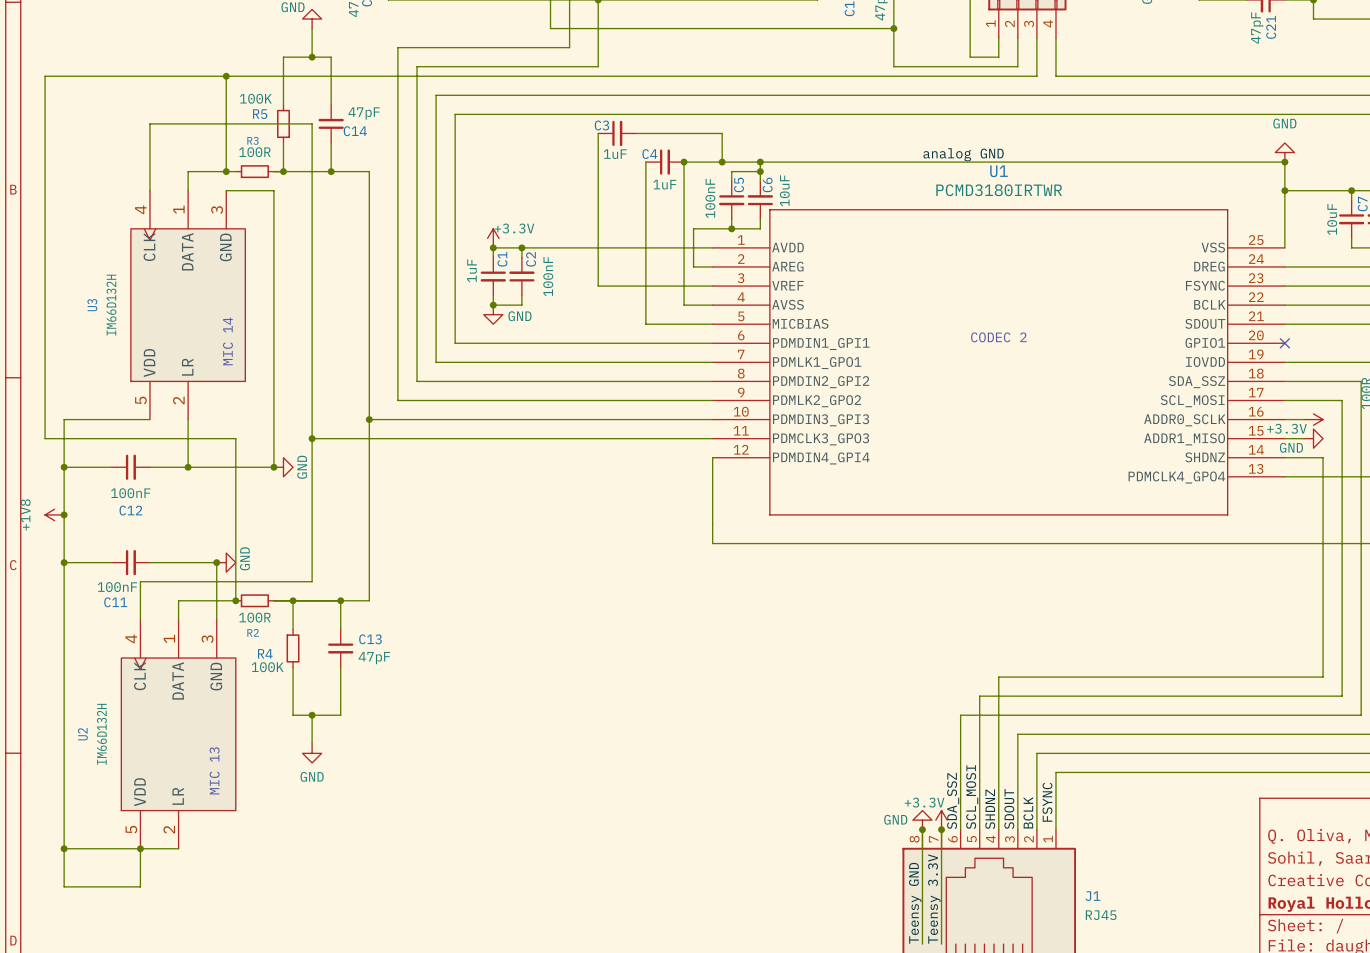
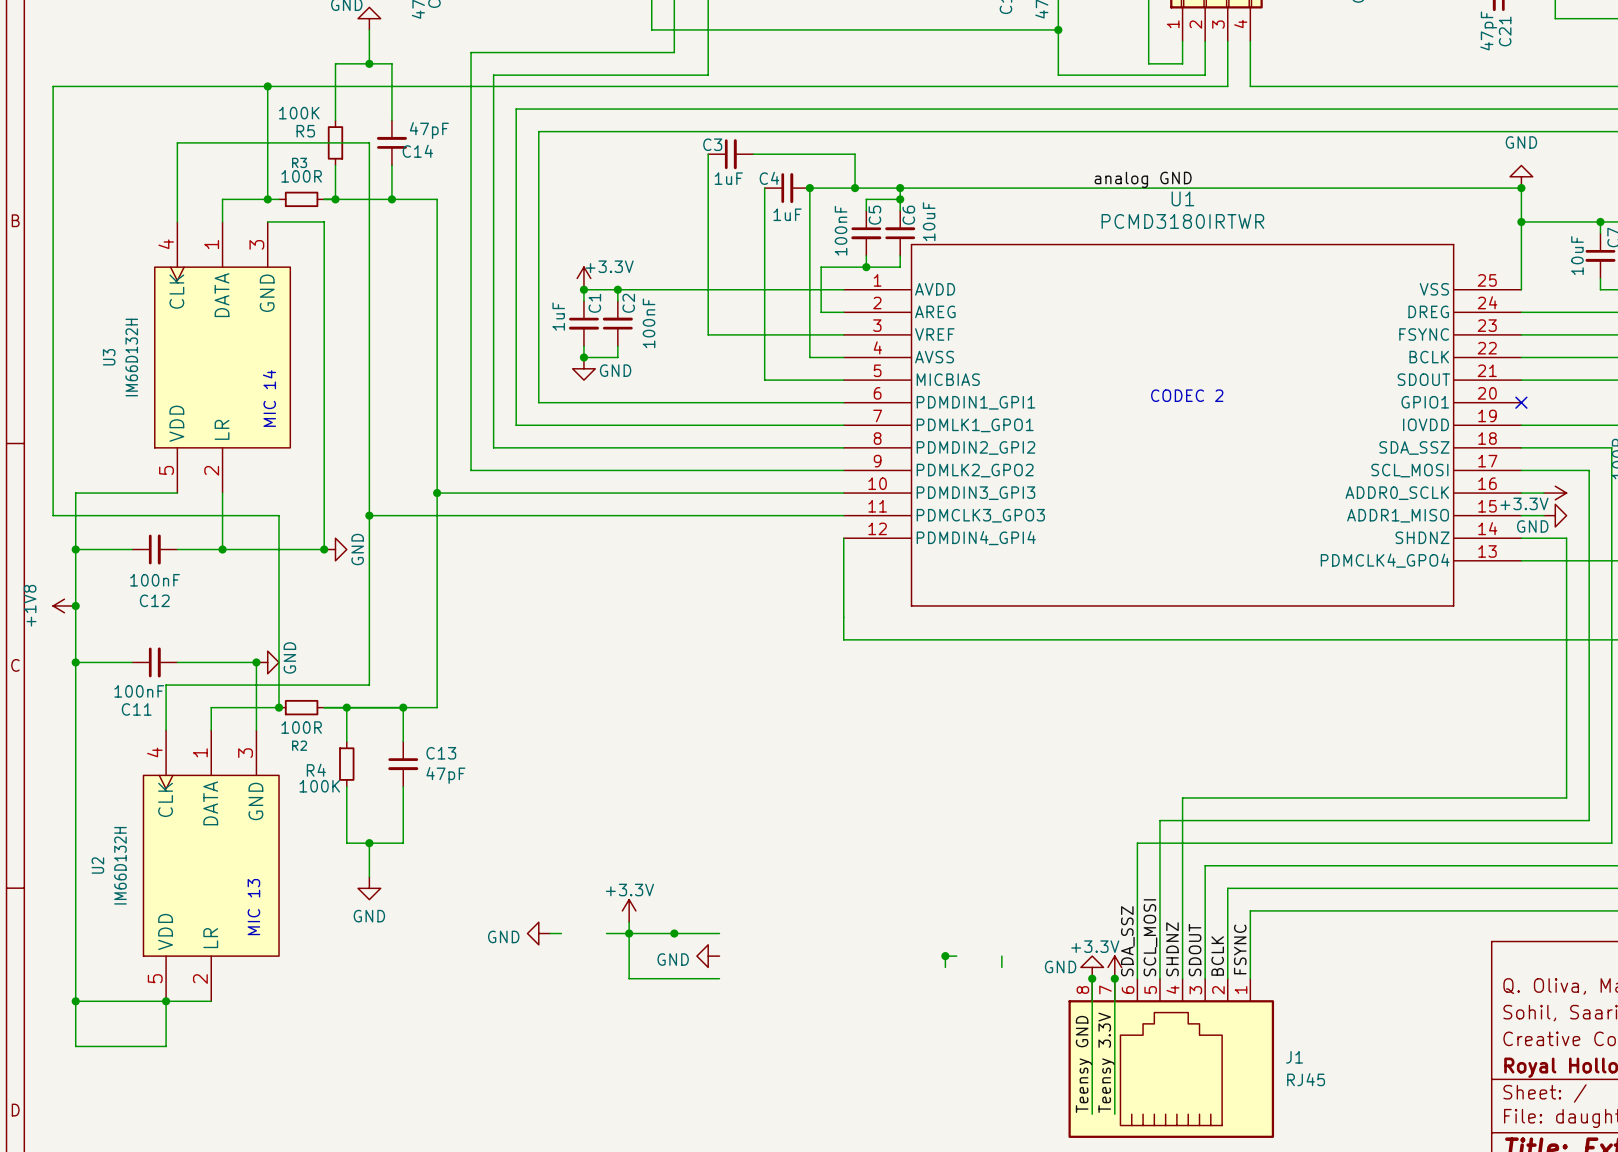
power symbol: none -> +3.3V (629, 910)
wire: none -> (629, 922) (629, 978) (719, 978)
power symbol: none -> GND (538, 933)
wire: none -> (550, 933) (561, 933)
wire: none -> (606, 933) (719, 933)
junction: none -> (629, 933)
junction: none -> (674, 933)
power symbol: none -> GND (708, 956)
junction: none -> (945, 956)
wire: none -> (956, 956) (945, 956) (945, 967)
wire: none -> (1001, 956) (1001, 967)

